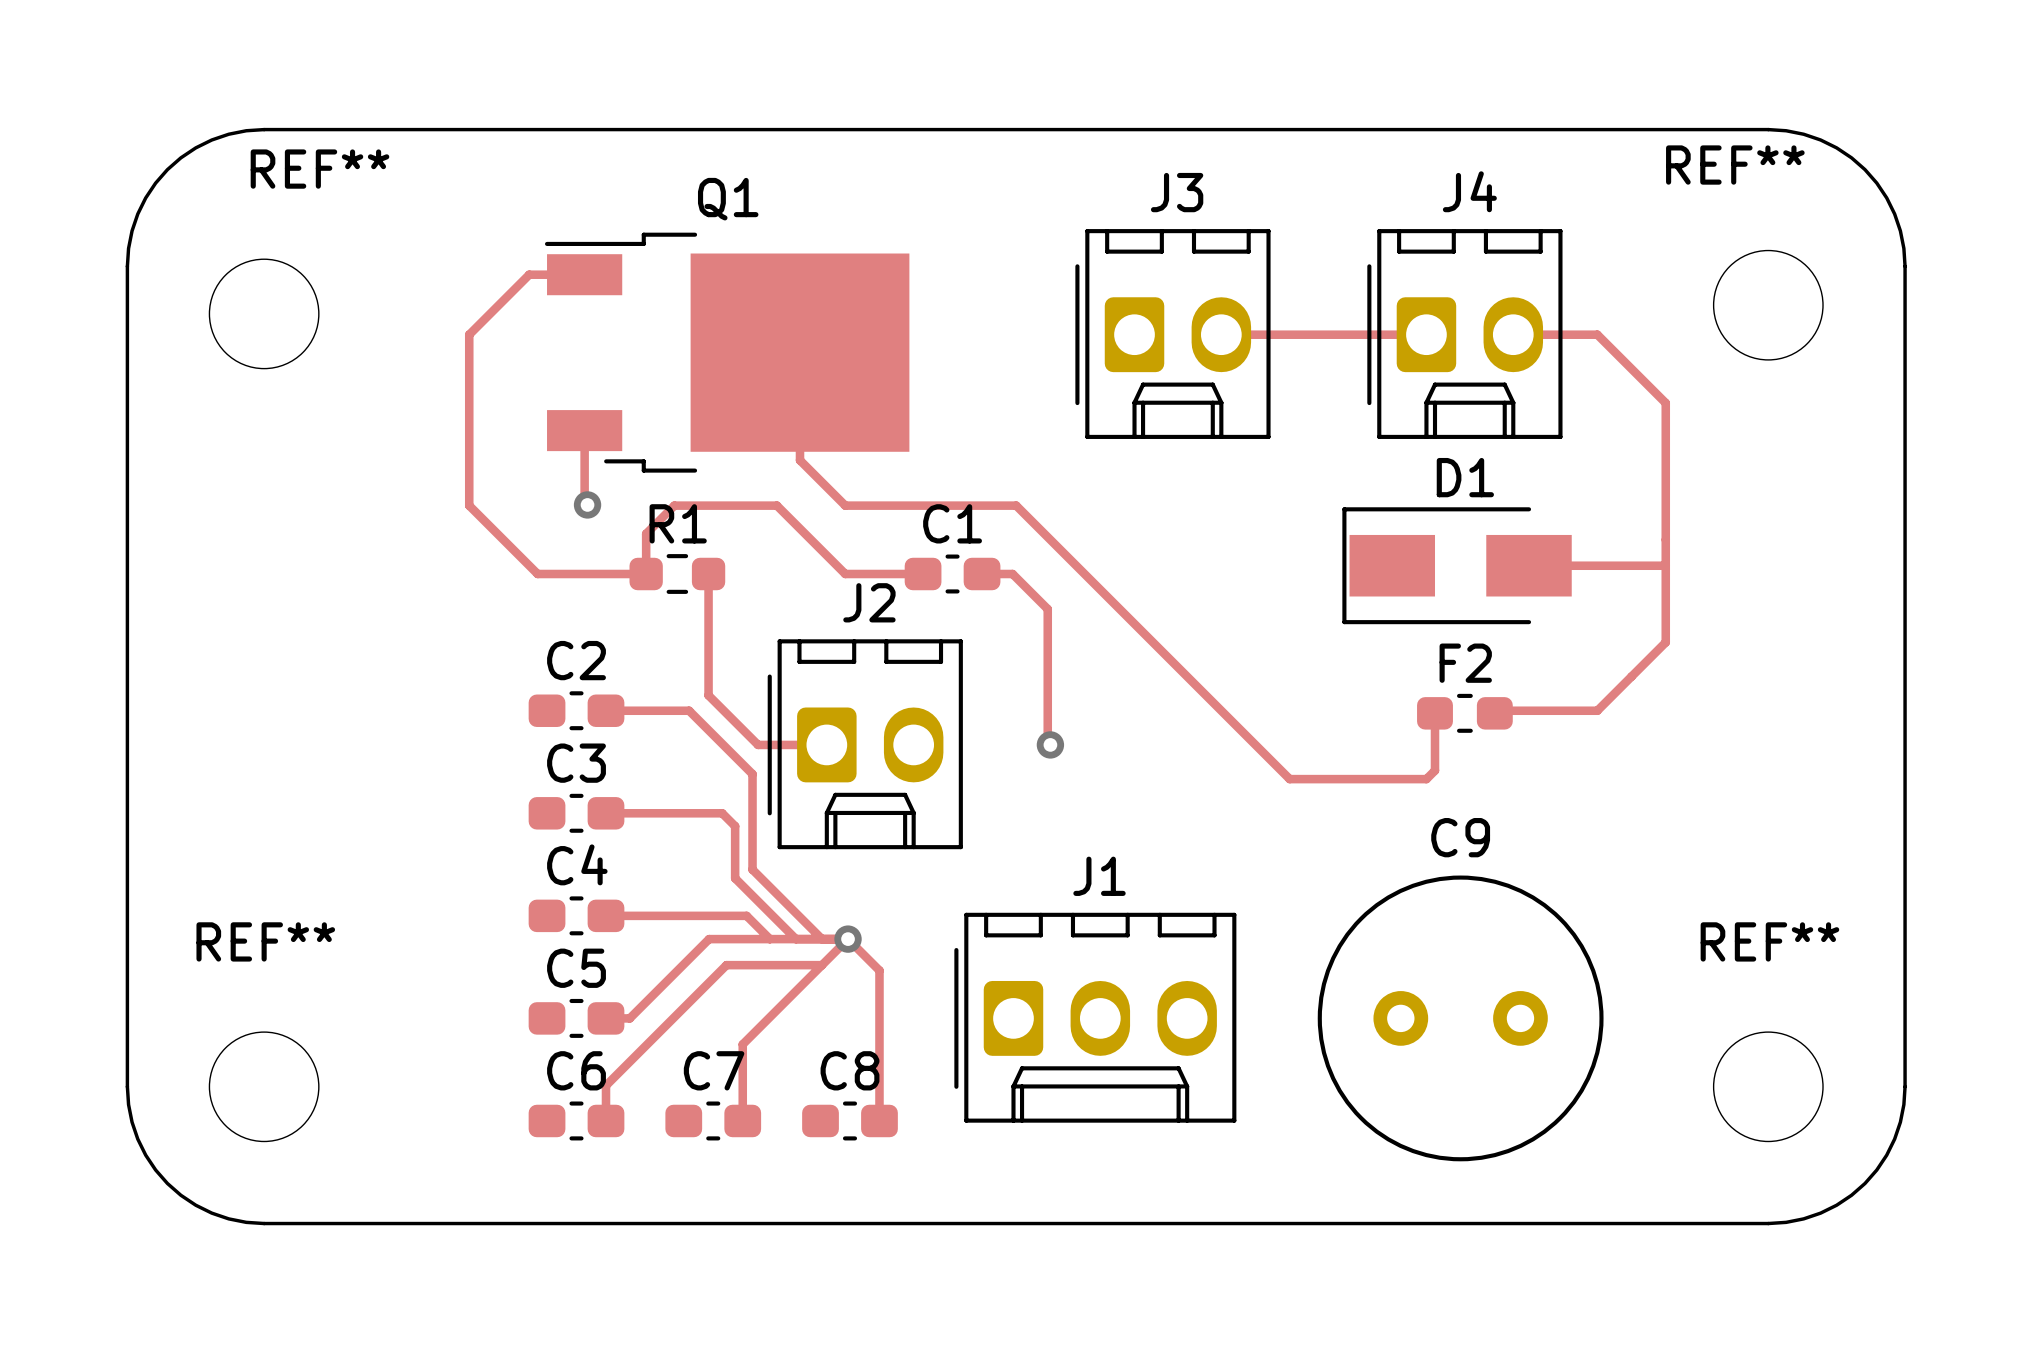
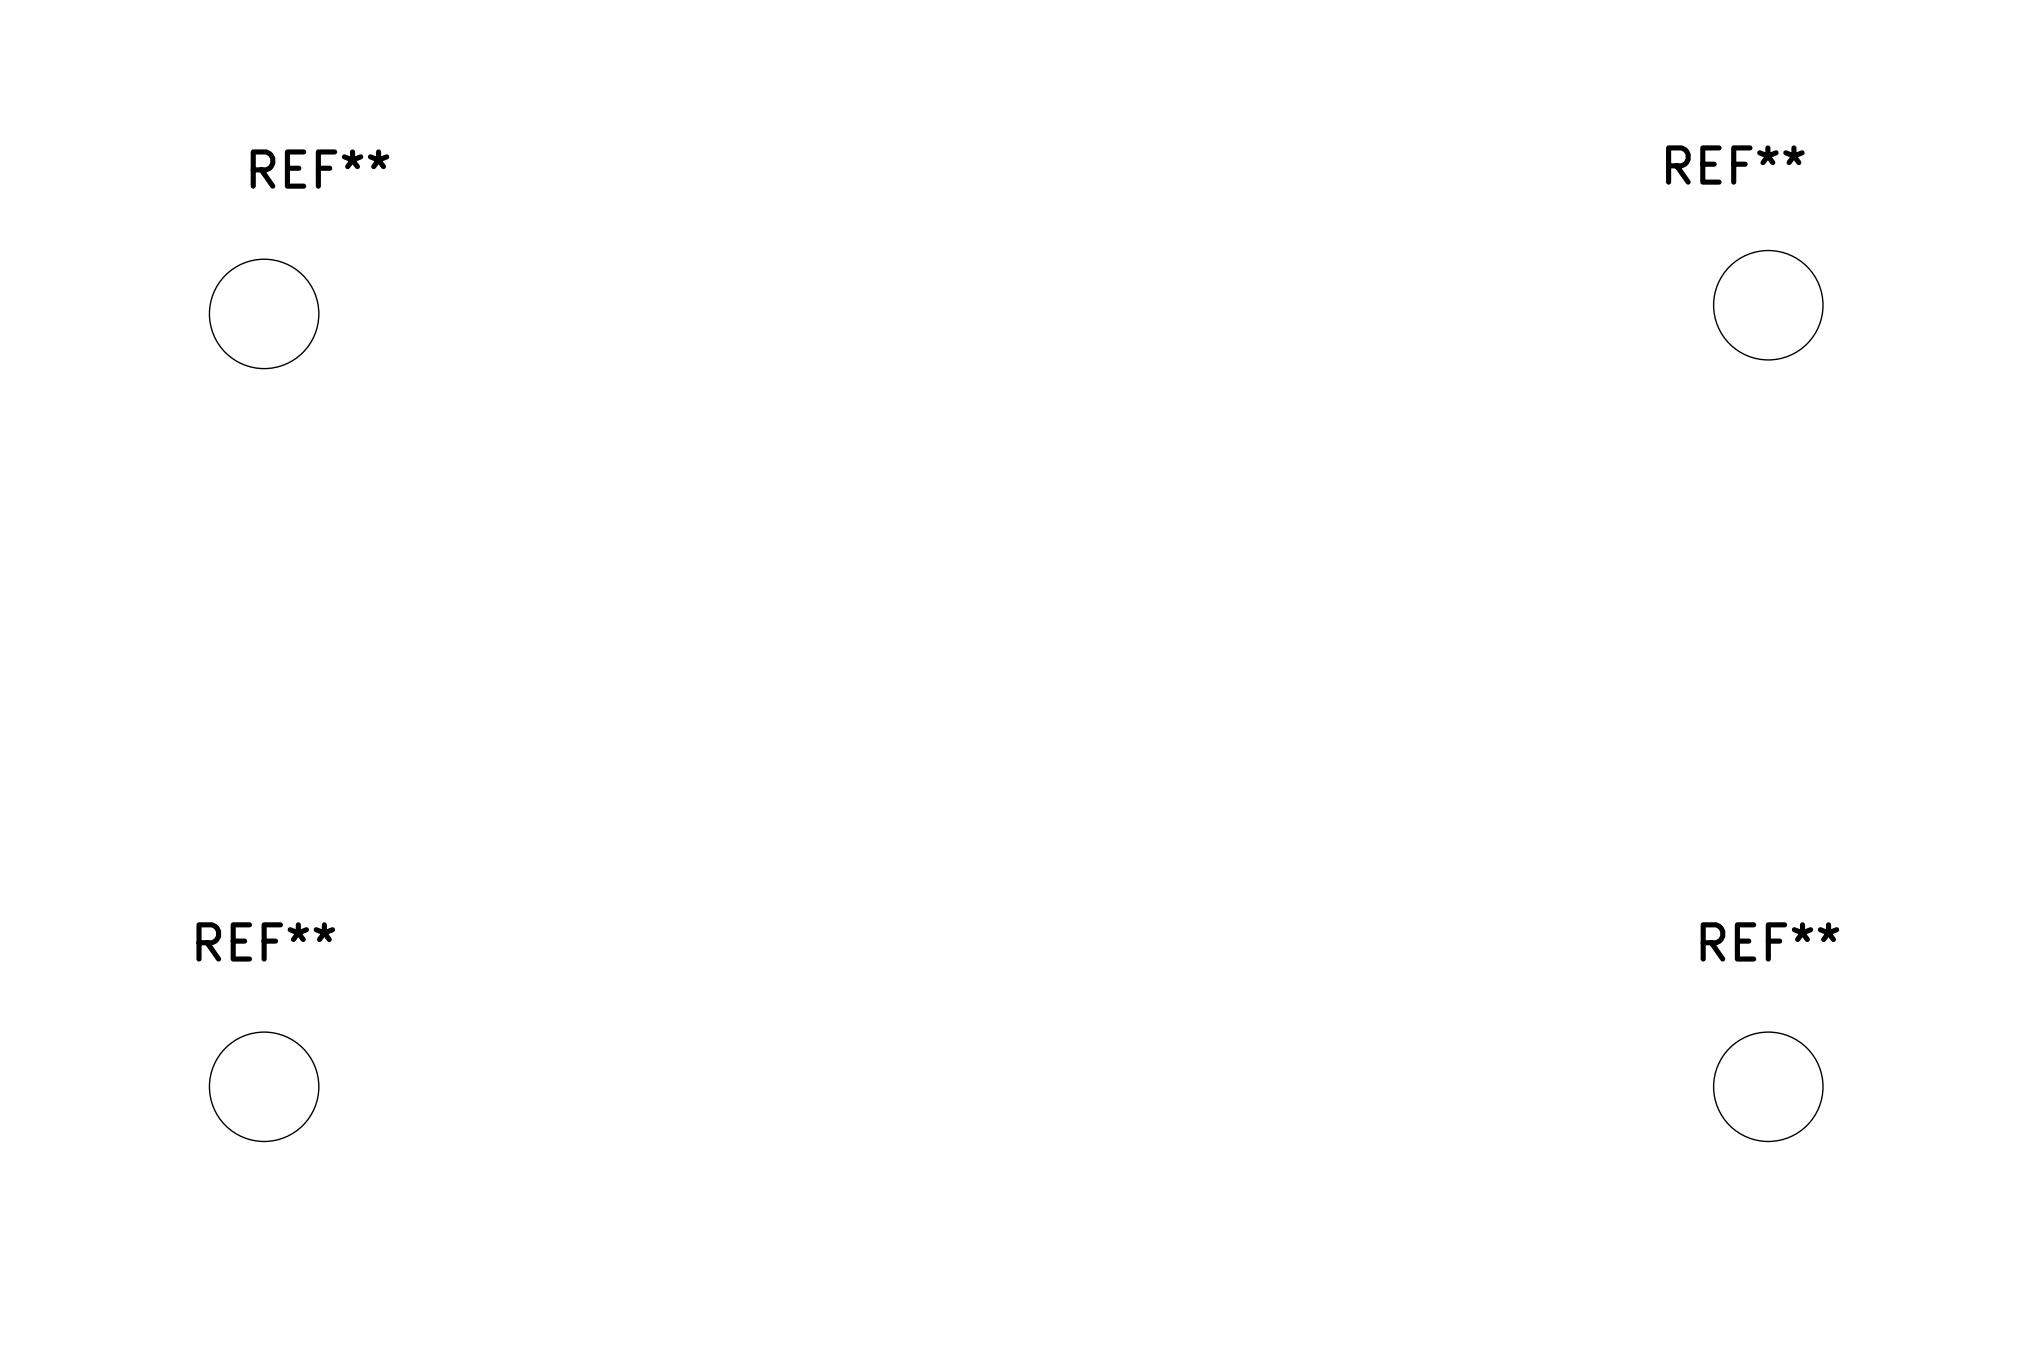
board edge: (264, 129) (1768, 129) (1803, 134) (1836, 147) (1865, 169) (1886, 197) (1900, 230) (1905, 266) (1905, 1086) (1900, 1122) (1886, 1155) (1865, 1183) (1836, 1205) (1803, 1218) (1768, 1223) (264, 1223) (228, 1218) (195, 1205) (167, 1183) (145, 1155) (132, 1122) (128, 1104) (127, 266) (128, 248) (137, 214) (145, 197) (167, 169) (195, 147) (211, 139) (246, 130) (264, 129) -> none
top track: (584, 274) (529, 274) (469, 334) (469, 505) (537, 574) (646, 574) (646, 533) (674, 505) (776, 505) (845, 574) (923, 574) -> none
J3: (1172, 334) -> none
top track: (1221, 334) (1426, 334) -> none
J4: (1464, 334) -> none
top track: (1513, 334) (1597, 334) (1665, 403) (1665, 642) (1597, 710) (1494, 710) -> none
Q1: (727, 352) -> none
top track: (800, 352) (800, 460) (845, 505) (1016, 505) (1289, 779) (1426, 779) (1435, 770) (1435, 710) -> none
top track: (584, 430) (584, 502) (587, 504) -> none
via: (587, 504) -> none
D1: (1457, 565) -> none
top track: (1529, 565) (1665, 565) -> none
R1: (677, 574) -> none
top track: (708, 574) (708, 695) (758, 744) (826, 744) -> none
C1: (952, 574) -> none
top track: (982, 574) (1012, 574) (1047, 609) (1047, 742) (1050, 744) -> none
C2: (576, 710) -> none
top track: (605, 710) (689, 710) (752, 774) (752, 869) (821, 939) -> none
F2: (1464, 713) -> none
J2: (865, 744) -> none
via: (1050, 744) -> none
C3: (576, 813) -> none
top track: (605, 813) (722, 813) (735, 826) (735, 878) (795, 939) -> none
C4: (576, 915) -> none
top track: (605, 915) (746, 915) (769, 939) -> none
top track: (848, 939) (709, 939) (629, 1018) (605, 1018) -> none
top track: (848, 939) (879, 970) (879, 1120) -> none
top track: (848, 939) (742, 1044) (742, 1120) -> none
via: (848, 939) -> none
top track: (821, 965) (726, 965) (605, 1085) (605, 1120) -> none
J1: (1095, 1017) -> none
C5: (576, 1018) -> none
C9: (1460, 1018) -> none
C6: (576, 1120) -> none
C7: (713, 1120) -> none
C8: (849, 1120) -> none

